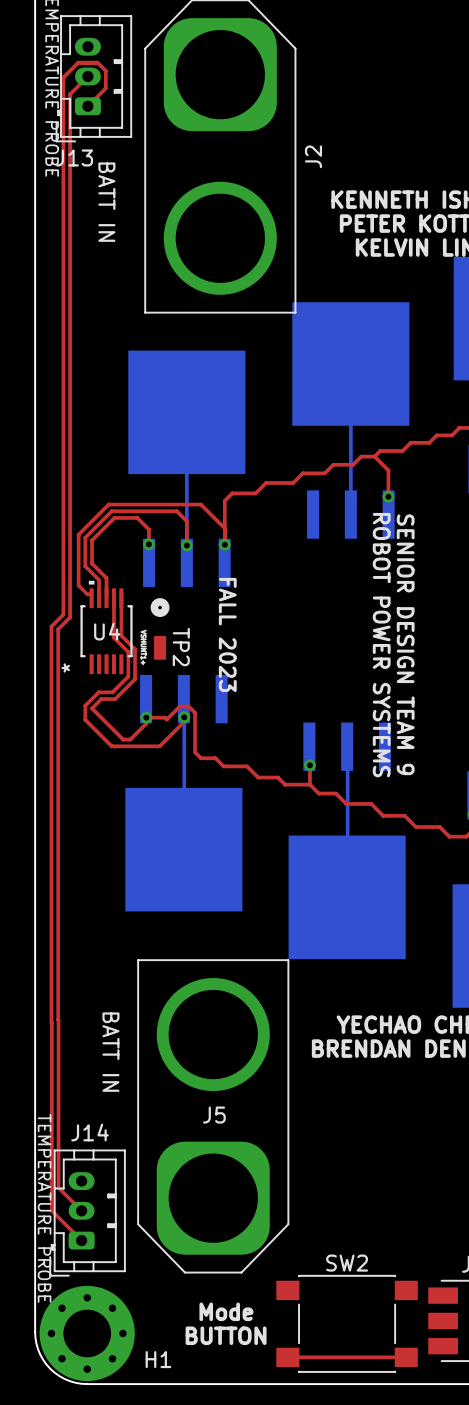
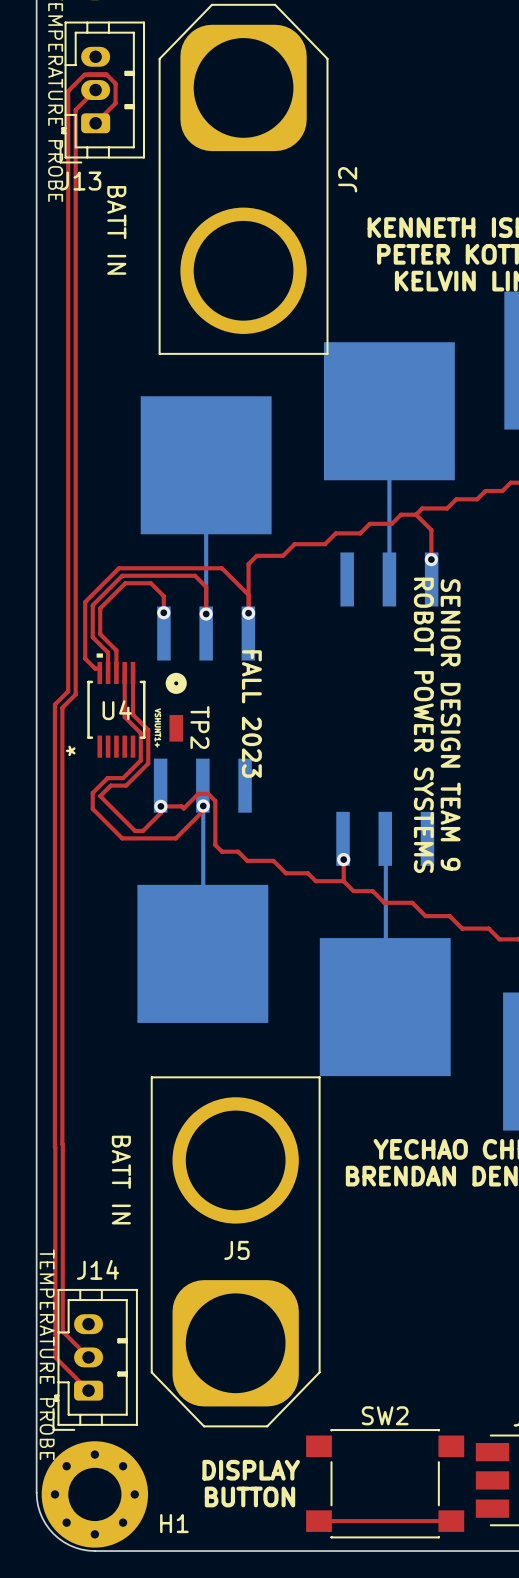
text: Mode (226, 1311) -> DISPLAY (251, 1470)

